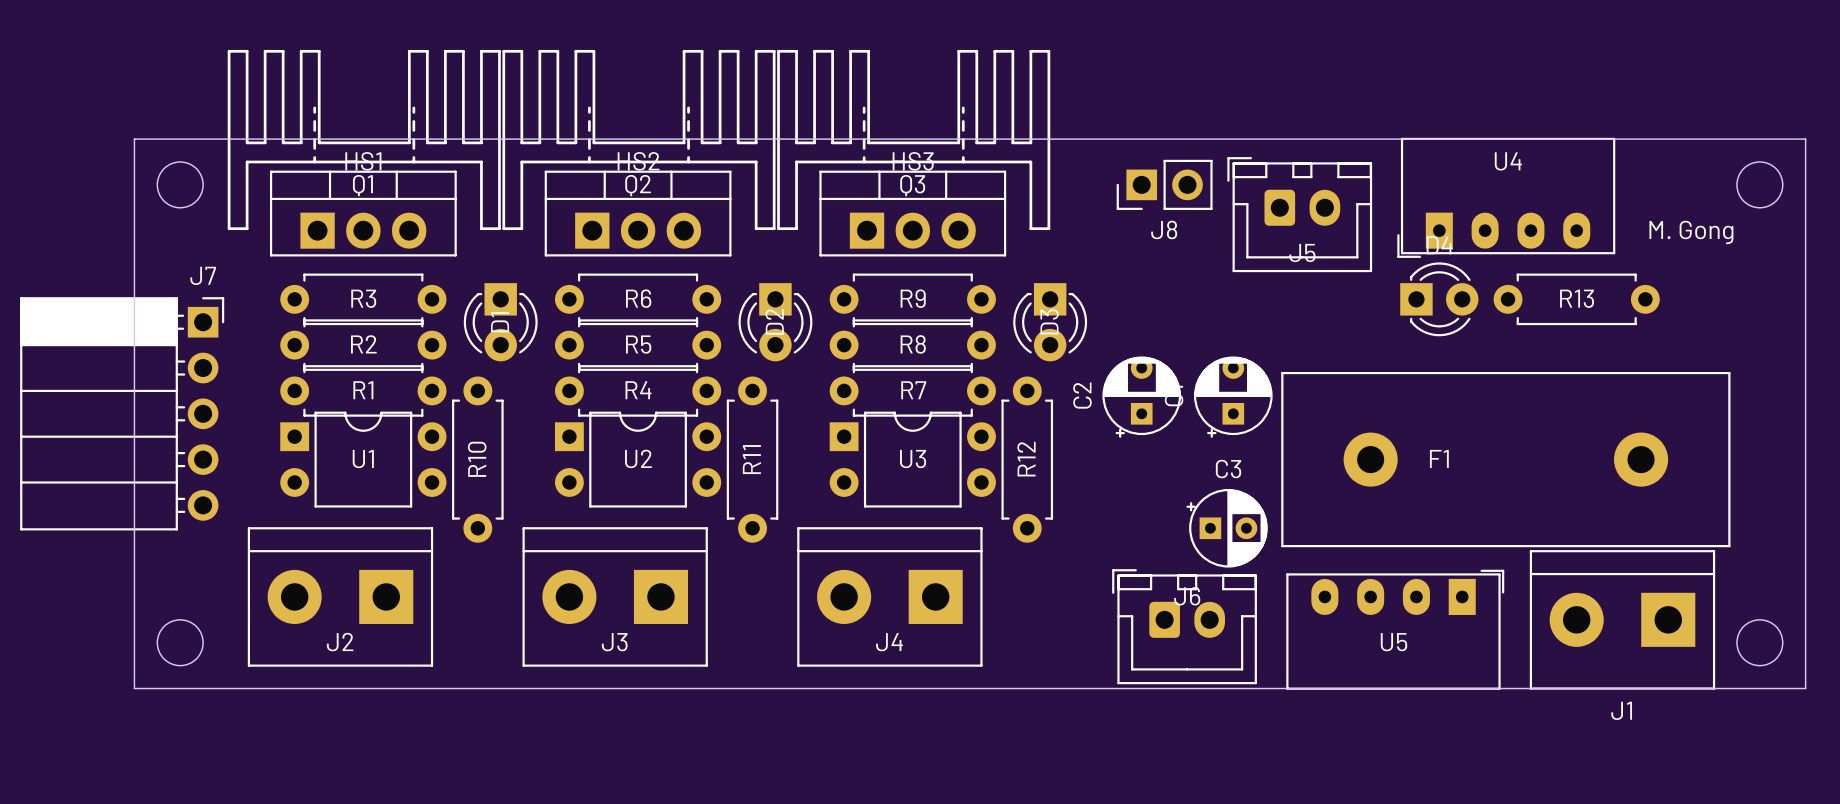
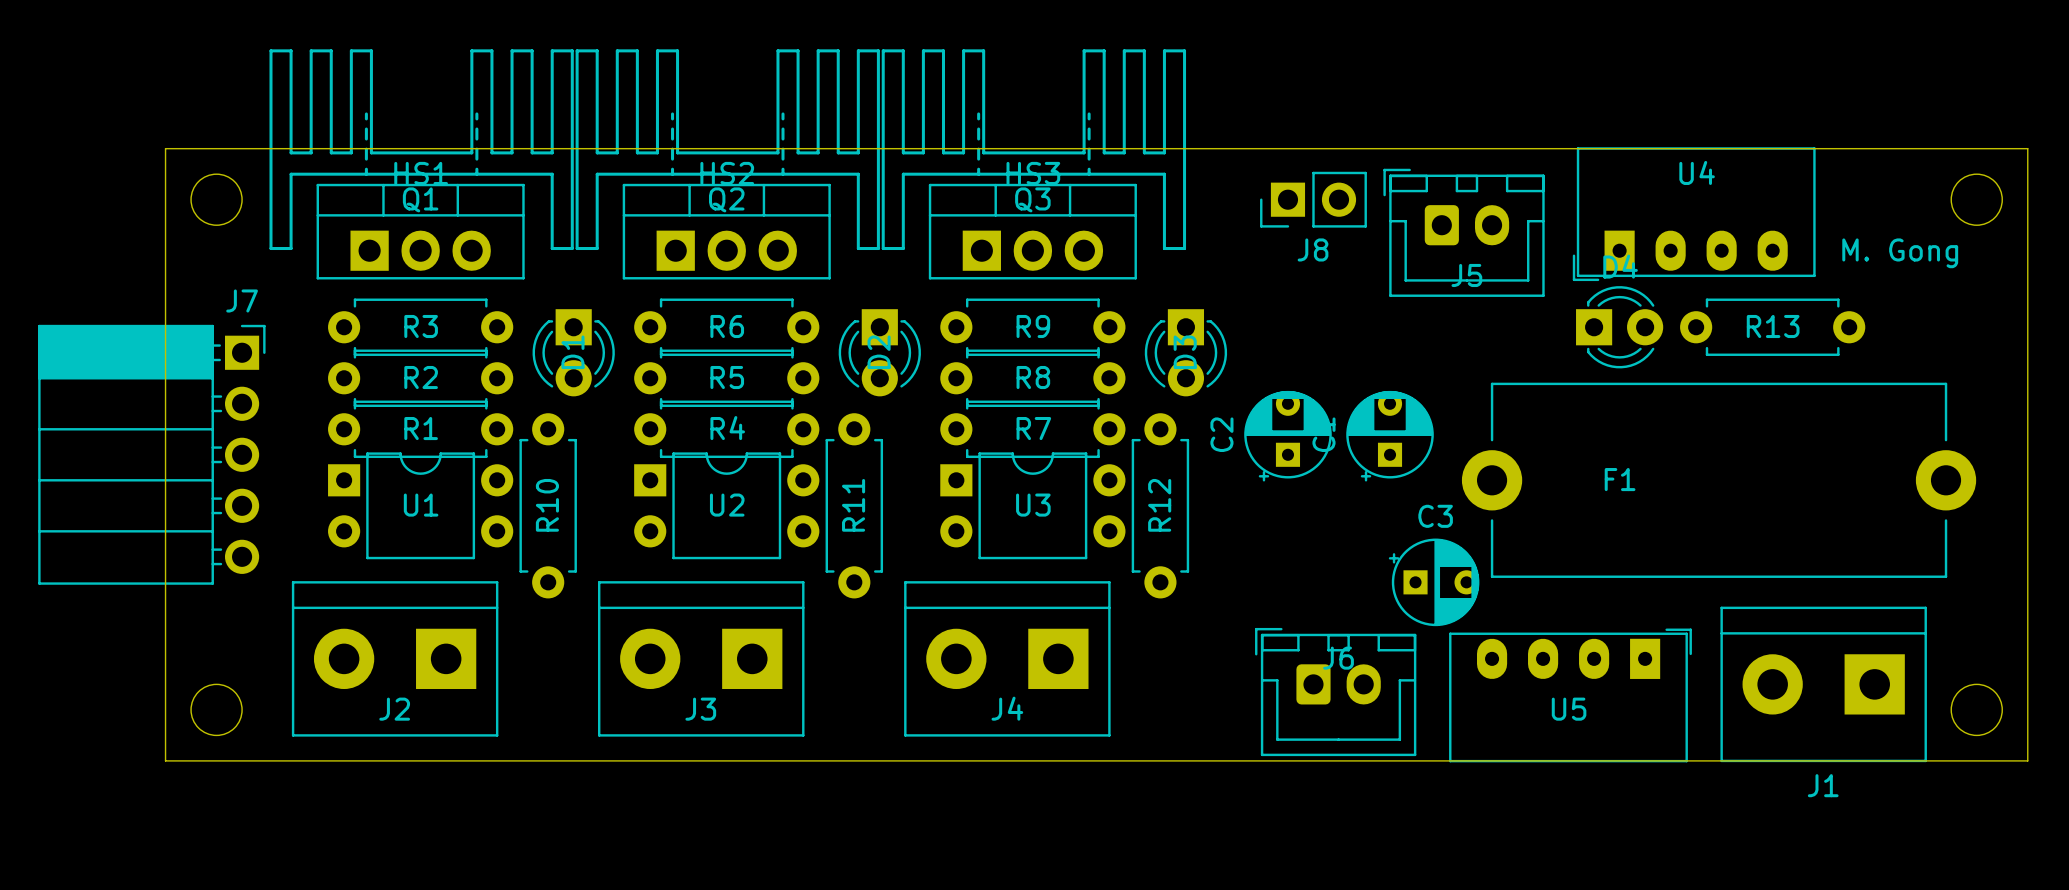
F1 footprint: [1281, 371, 1731, 548] -> [1461, 382, 1977, 578]
C3 footprint: [1186, 488, 1268, 568] -> [1388, 538, 1480, 627]

